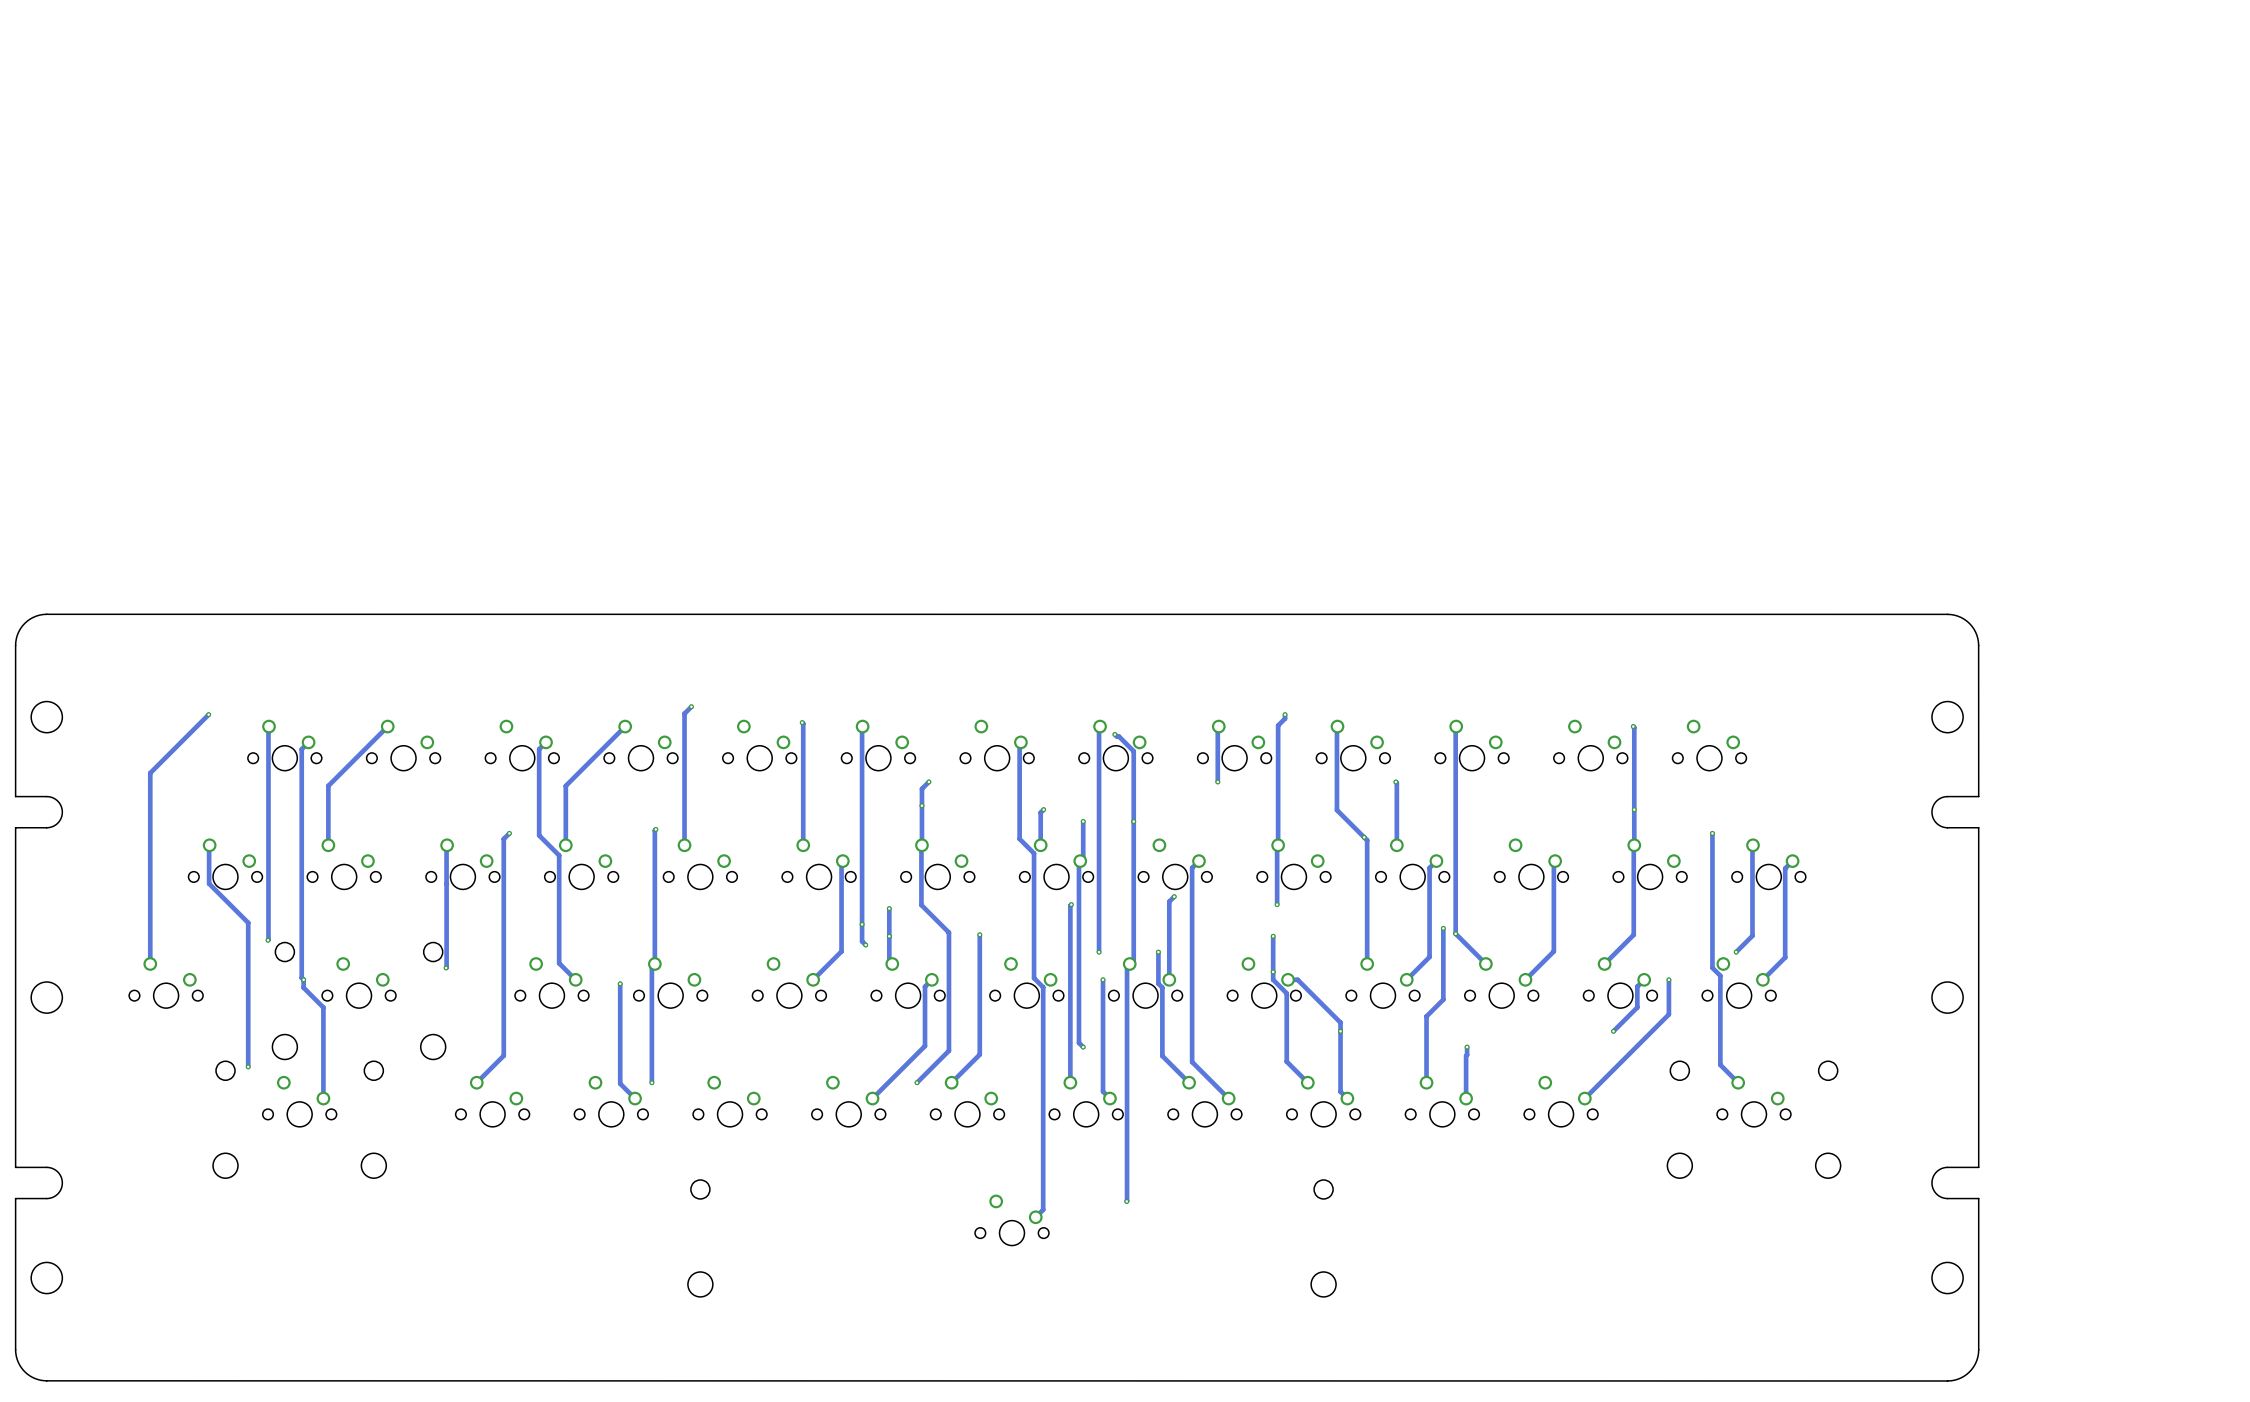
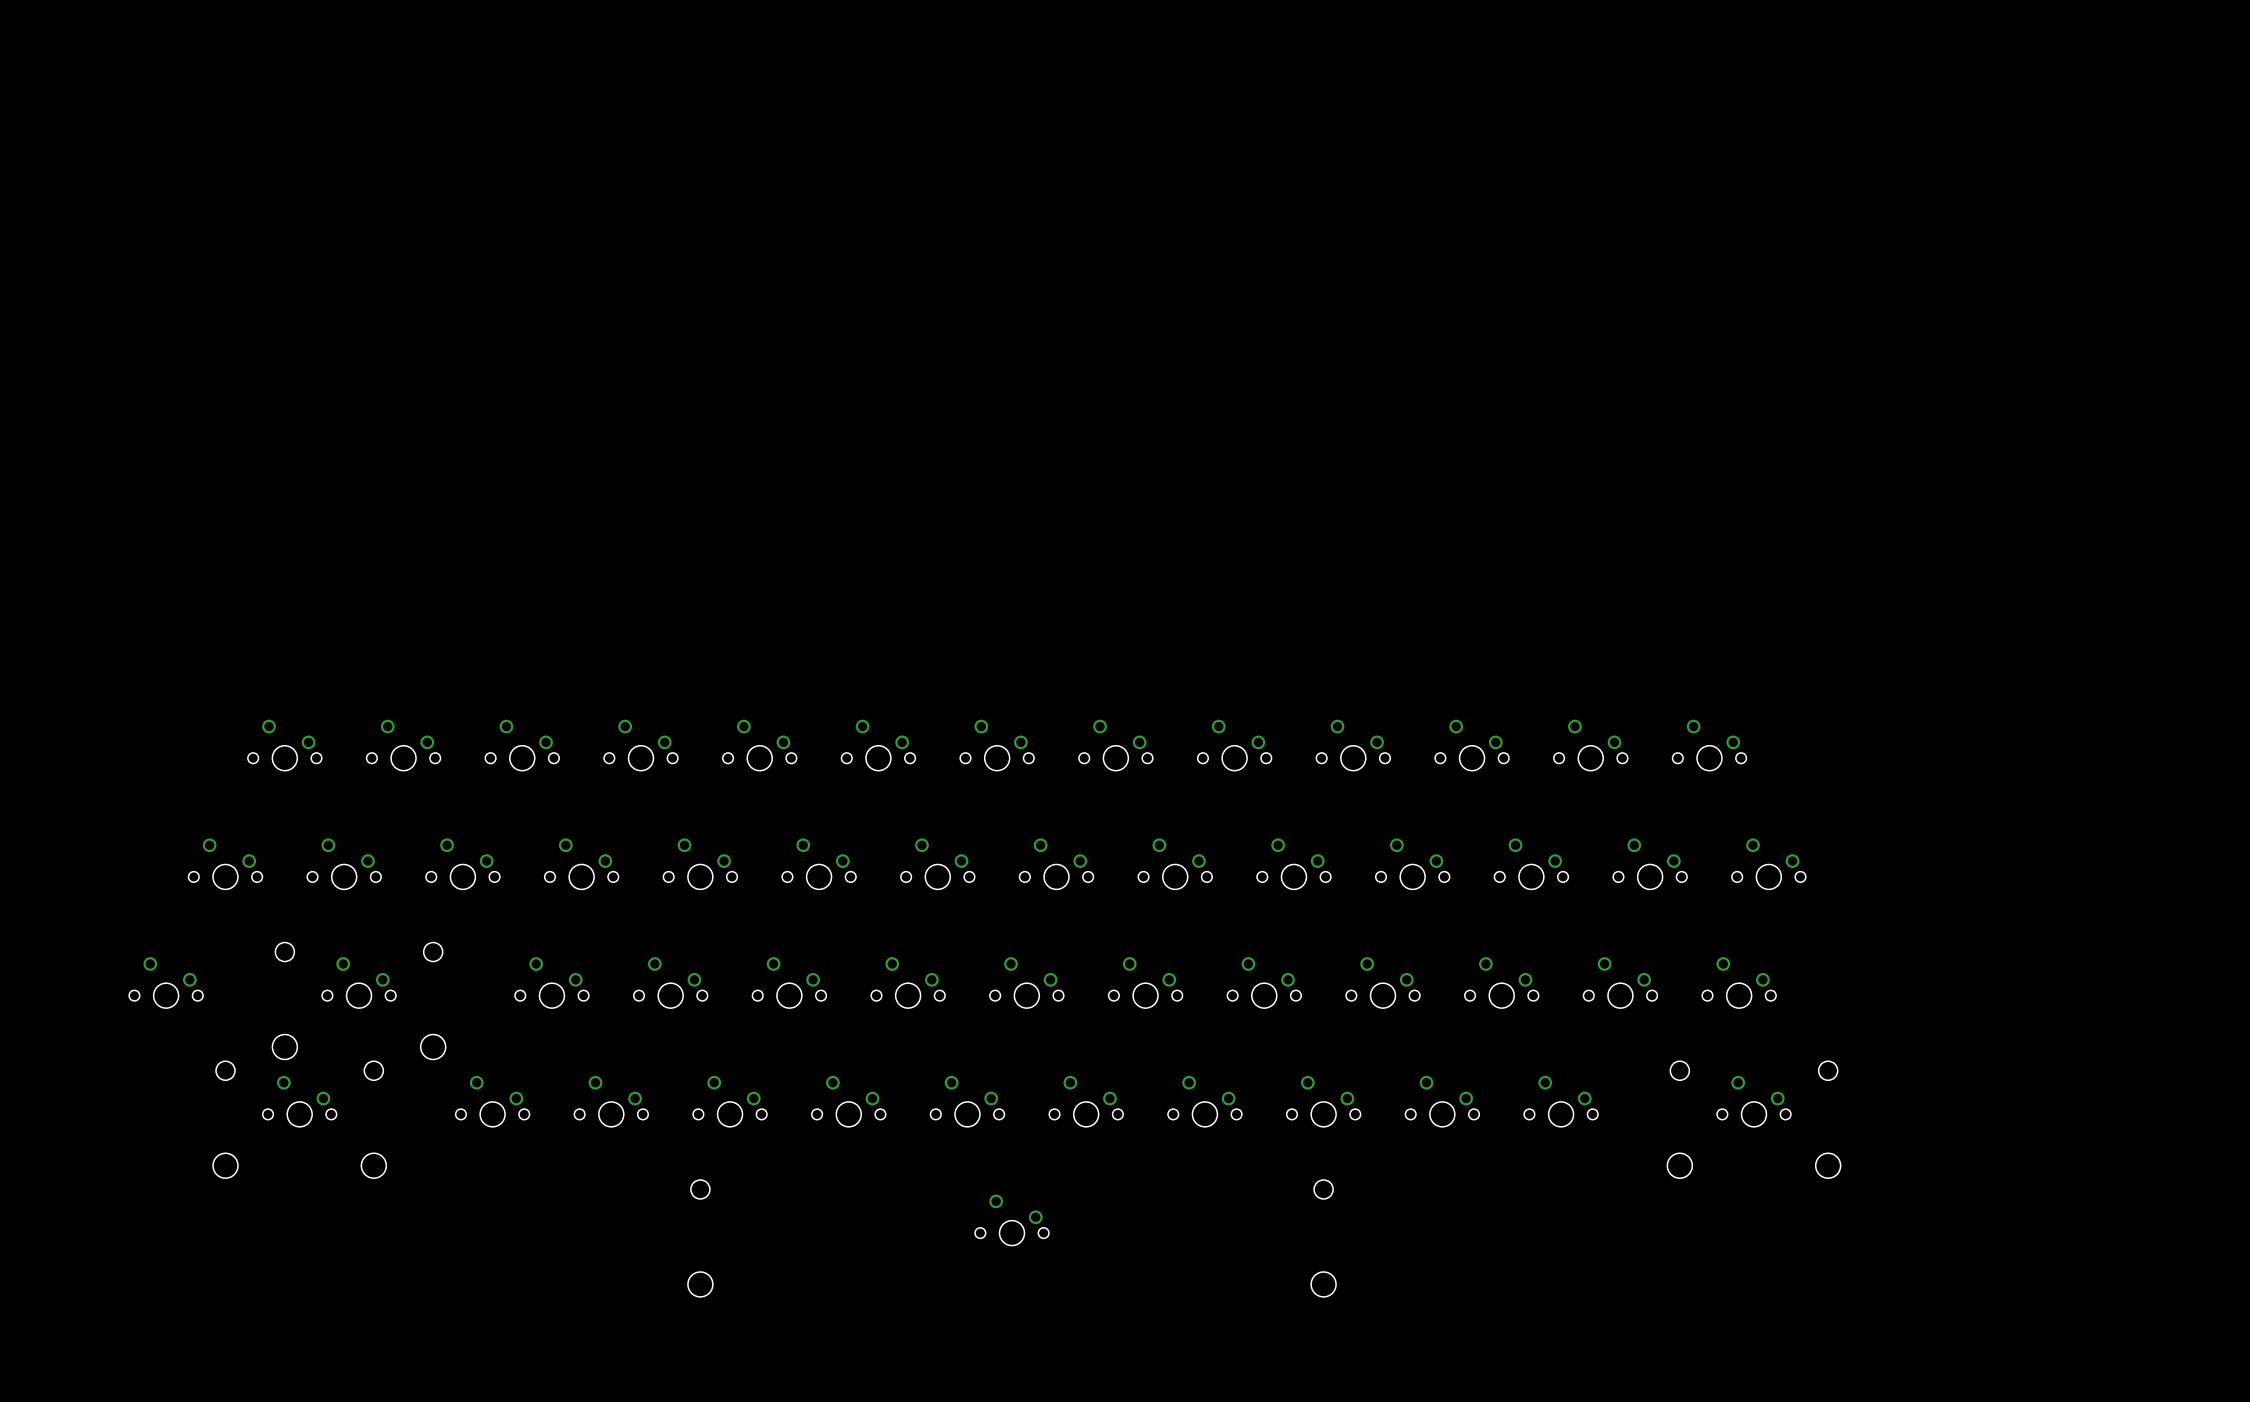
board edge: (46, 614) (1947, 614) (1957, 616) (1971, 626) (1978, 642) (1978, 796) (1942, 797) (1934, 803) (1931, 812) (1934, 821) (1942, 826) (1978, 827) (1978, 1167) (1942, 1168) (1934, 1174) (1931, 1182) (1934, 1191) (1942, 1197) (1978, 1198) (1978, 1349) (1976, 1360) (1966, 1374) (1957, 1379) (1947, 1381) (46, 1380) (36, 1379) (22, 1369) (15, 1353) (15, 1198) (52, 1197) (59, 1191) (62, 1182) (59, 1174) (52, 1168) (15, 1167) (15, 827) (52, 826) (59, 821) (62, 812) (59, 803) (52, 797) (15, 796) (15, 645) (18, 631) (24, 623) (33, 617) (46, 614) -> none
round board edge: [31, 701, 63, 733] -> none
round board edge: [1931, 701, 1964, 733] -> none
track: (691, 706) (684, 713) (684, 845) -> none
via: (691, 706) -> none
track: (208, 714) (150, 773) (150, 963) -> none
via: (208, 714) -> none
track: (1285, 714) (1285, 718) (1278, 725) (1277, 904) -> none
via: (1285, 714) -> none
track: (802, 722) (803, 845) -> none
via: (802, 722) -> none
track: (269, 726) (268, 940) -> none
track: (387, 726) (328, 785) (328, 845) -> none
track: (625, 726) (565, 785) (565, 845) -> none
track: (862, 726) (862, 941) (865, 945) -> none
track: (1100, 726) (1099, 952) -> none
track: (1218, 726) (1217, 781) -> none
track: (1337, 726) (1336, 810) (1367, 840) (1367, 963) -> none
track: (1456, 726) (1455, 933) (1485, 963) -> none
track: (1633, 726) (1633, 934) (1604, 963) -> none
via: (1633, 726) -> none
track: (1114, 734) (1133, 751) (1133, 960) (1127, 966) (1126, 1201) -> none
via: (1114, 734) -> none
track: (308, 742) (301, 749) (301, 977) (303, 979) (303, 987) (323, 1007) (323, 1098) -> none
track: (546, 742) (539, 749) (539, 835) (559, 855) (559, 963) (575, 979) -> none
track: (1020, 742) (1019, 838) (1034, 853) (1034, 978) (1043, 987) (1043, 1209) (1035, 1217) -> none
track: (928, 781) (921, 788) (921, 905) (948, 932) (948, 1050) (917, 1082) -> none
via: (928, 781) -> none
via: (1217, 781) -> none
track: (1395, 781) (1396, 845) -> none
via: (1395, 781) -> none
via: (921, 805) -> none
track: (1043, 809) (1040, 812) (1040, 845) -> none
via: (1043, 809) -> none
via: (1634, 809) -> none
track: (1083, 821) (1083, 858) (1078, 862) (1078, 1042) (1083, 1047) -> none
via: (1083, 821) -> none
via: (1133, 821) -> none
track: (655, 829) (654, 963) (651, 966) (651, 1082) -> none
via: (655, 829) -> none
track: (509, 833) (503, 839) (503, 1055) (476, 1082) -> none
via: (509, 833) -> none
track: (1712, 833) (1712, 967) (1720, 975) (1720, 1064) (1738, 1082) -> none
via: (1712, 833) -> none
via: (1364, 837) -> none
track: (209, 845) (209, 883) (248, 922) (248, 1066) -> none
track: (447, 845) (446, 883) -> none
track: (1753, 845) (1752, 935) (1736, 952) -> none
track: (842, 861) (841, 951) (813, 979) -> none
track: (1198, 861) (1192, 867) (1192, 1062) (1228, 1098) -> none
track: (1436, 861) (1429, 867) (1429, 957) (1406, 979) -> none
track: (1555, 861) (1553, 951) (1525, 979) -> none
track: (1792, 861) (1785, 868) (1785, 957) (1762, 979) -> none
track: (446, 883) (446, 967) -> none
track: (1174, 896) (1169, 901) (1169, 979) -> none
via: (1174, 896) -> none
track: (1071, 904) (1070, 1082) -> none
via: (1071, 904) -> none
via: (1277, 904) -> none
track: (889, 908) (889, 961) (892, 963) -> none
via: (889, 908) -> none
via: (862, 924) -> none
track: (1443, 928) (1443, 999) (1426, 1016) (1426, 1082) -> none
via: (1443, 928) -> none
via: (1455, 933) -> none
track: (979, 934) (979, 1054) (951, 1082) -> none
via: (979, 934) -> none
via: (889, 936) -> none
track: (1273, 936) (1273, 979) (1286, 993) (1286, 1061) (1307, 1082) -> none
via: (1273, 936) -> none
via: (268, 940) -> none
via: (865, 945) -> none
via: (1099, 952) -> none
track: (1158, 952) (1158, 983) (1162, 987) (1162, 1056) (1189, 1082) -> none
via: (1158, 952) -> none
via: (1736, 952) -> none
via: (446, 967) -> none
via: (1273, 971) -> none
via: (303, 979) -> none
track: (931, 979) (925, 986) (925, 1046) (872, 1098) -> none
track: (1103, 979) (1103, 1091) (1109, 1098) -> none
via: (1103, 979) -> none
track: (1288, 979) (1297, 979) (1340, 1022) (1340, 1091) (1347, 1098) -> none
track: (1644, 979) (1637, 986) (1637, 1007) (1613, 1031) -> none
track: (1668, 979) (1668, 1014) (1584, 1098) -> none
via: (1668, 979) -> none
round board edge: [31, 981, 63, 1014] -> none
round board edge: [1931, 981, 1964, 1014] -> none
track: (620, 983) (620, 1083) (635, 1098) -> none
via: (620, 983) -> none
via: (1340, 1031) -> none
via: (1613, 1031) -> none
via: (1083, 1047) -> none
track: (1467, 1047) (1466, 1098) -> none
via: (1467, 1047) -> none
via: (248, 1066) -> none
via: (651, 1082) -> none
via: (917, 1082) -> none
via: (1126, 1201) -> none
round board edge: [31, 1262, 63, 1294] -> none
round board edge: [1931, 1262, 1964, 1294] -> none

